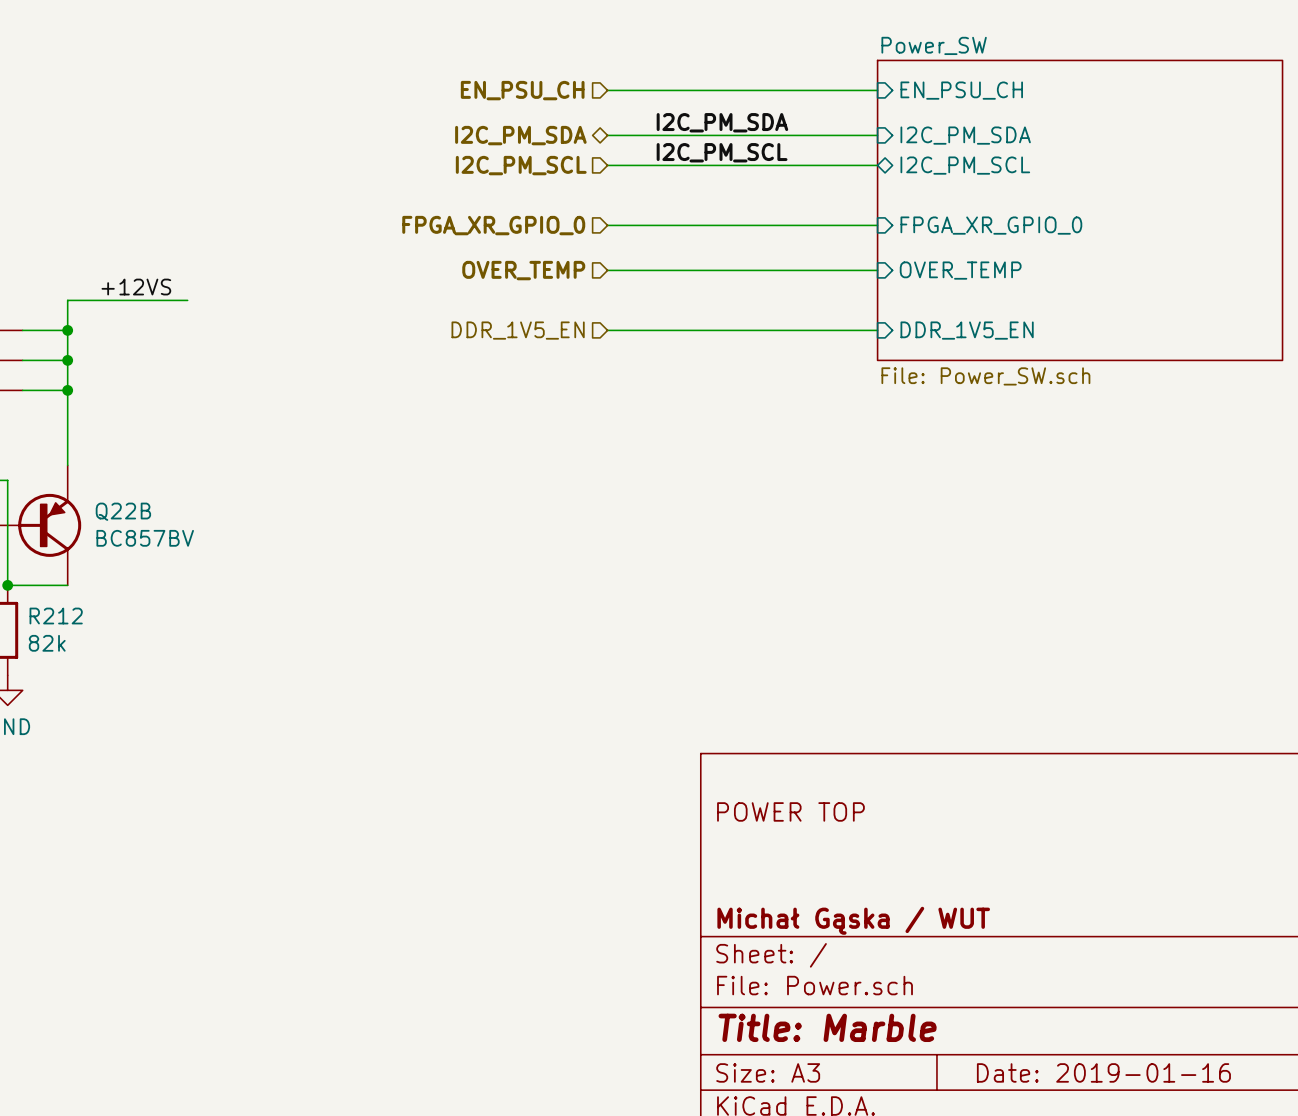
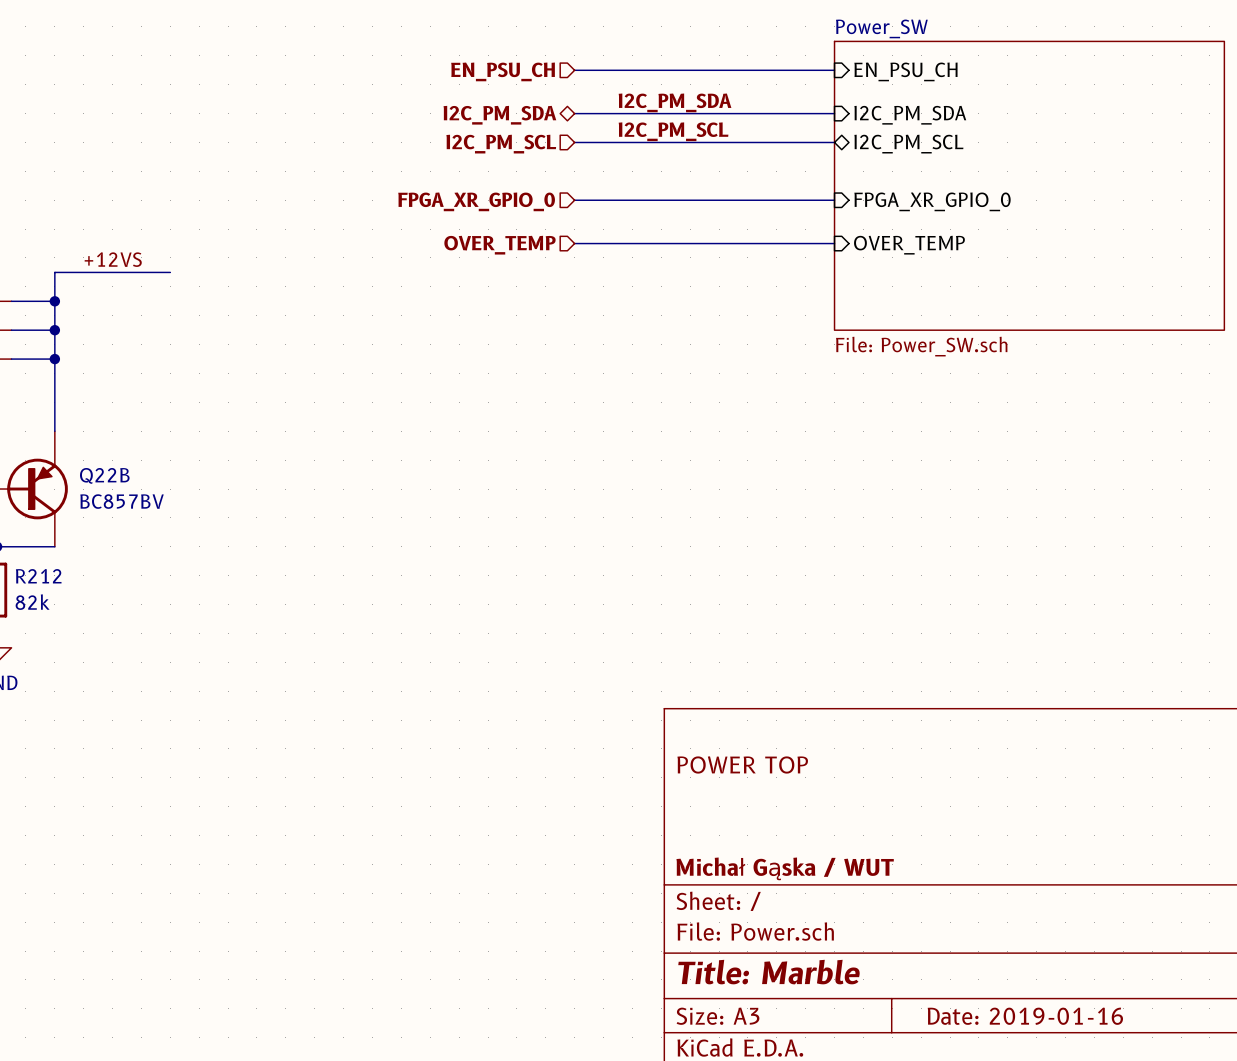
hierarchical label: DDR_1V5_EN (518, 330) -> none
wire: (607, 330) (877, 330) -> none
sheet pin: DDR_1V5_EN (967, 330) -> none

